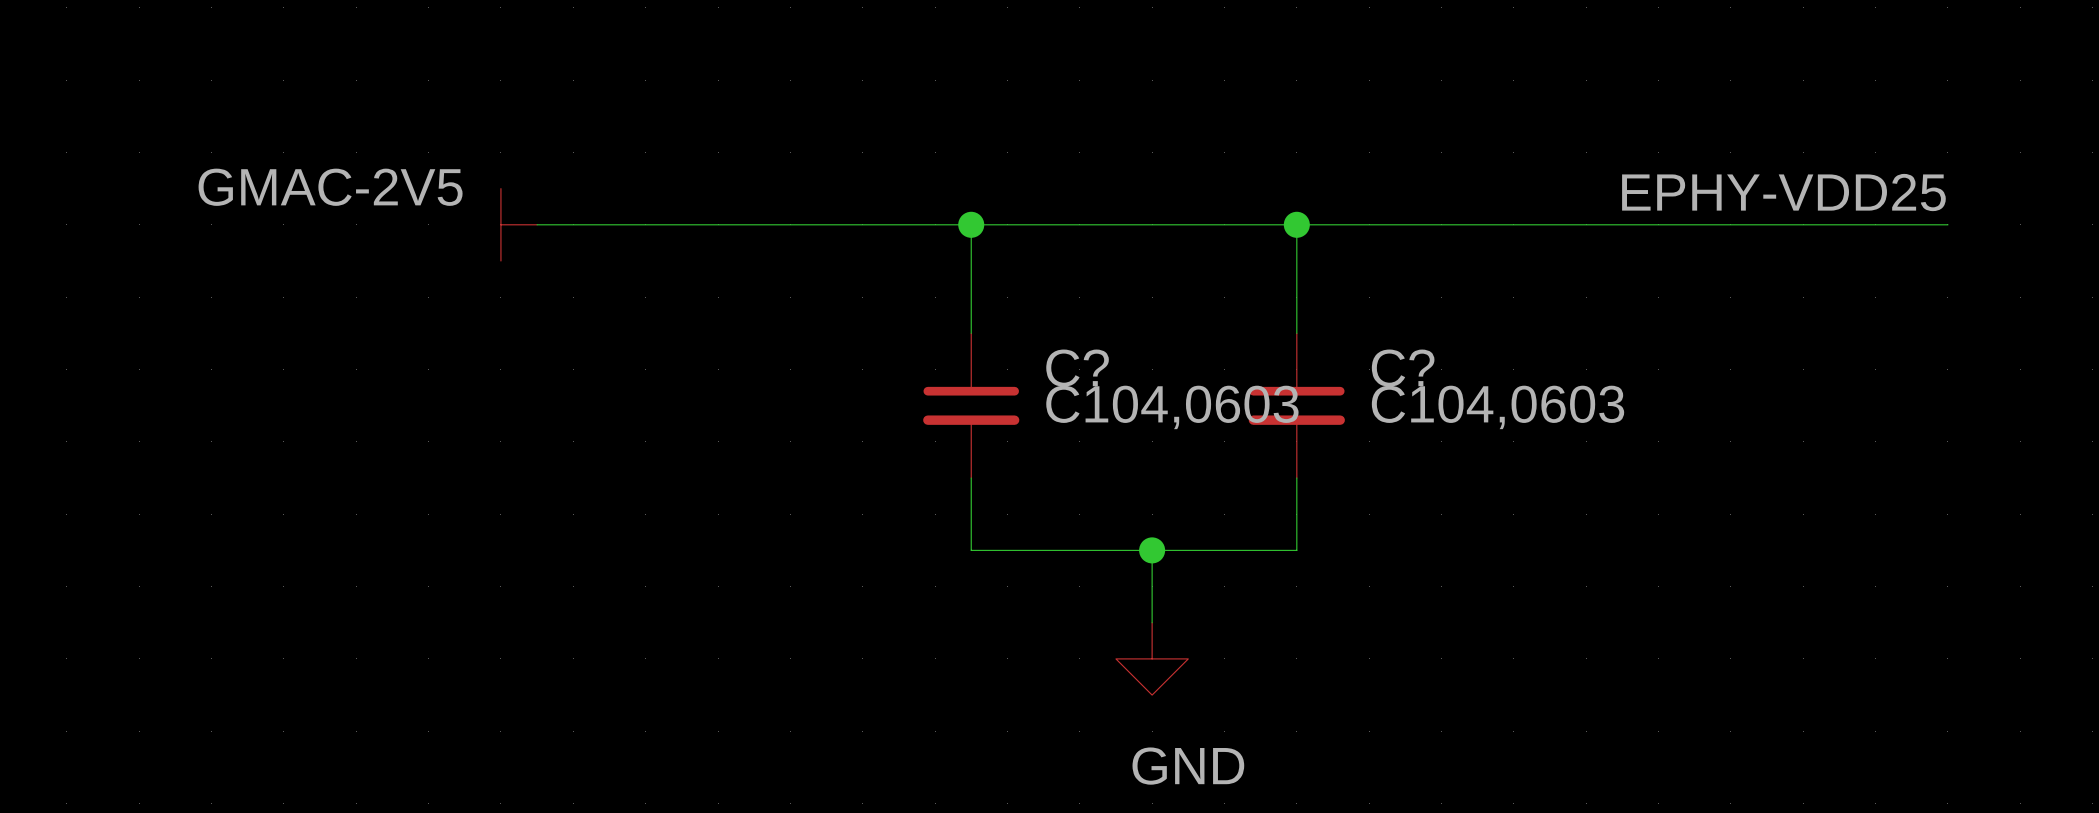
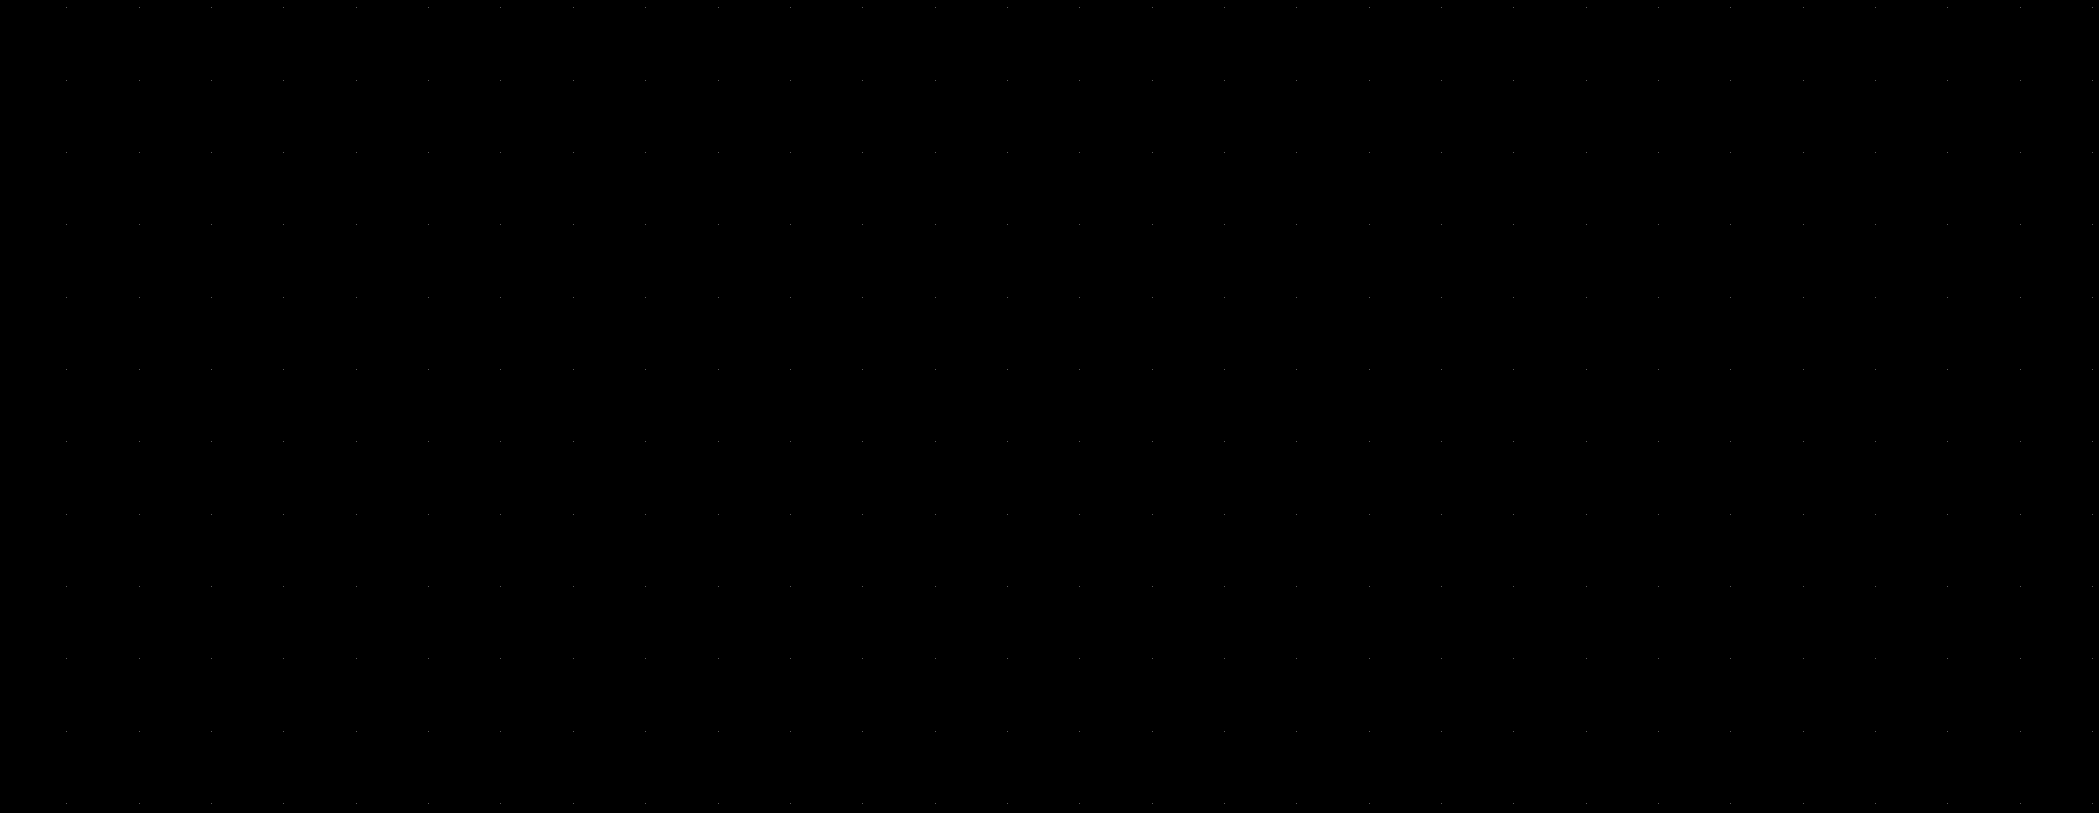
label: EPHY-VDD25 (1783, 192) -> none
power symbol: GMAC-2V5 (519, 224) -> none
wire: (537, 224) (1947, 224) -> none
wire: (971, 224) (971, 333) -> none
junction: (971, 224) -> none
wire: (1296, 224) (1296, 333) -> none
junction: (1296, 224) -> none
C?: C104,0603 (971, 405) -> none
C?: C104,0603 (1296, 405) -> none
wire: (971, 478) (971, 550) (1296, 550) (1296, 478) -> none
wire: (1152, 550) (1152, 622) -> none
junction: (1152, 550) -> none
power symbol: GND (1152, 658) -> none

